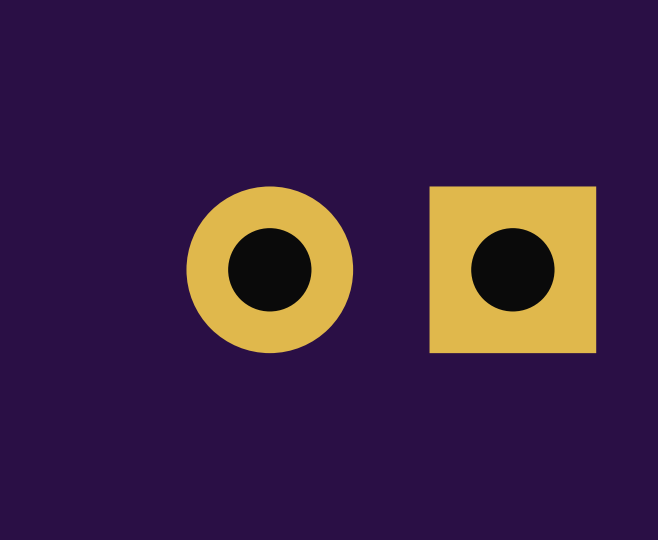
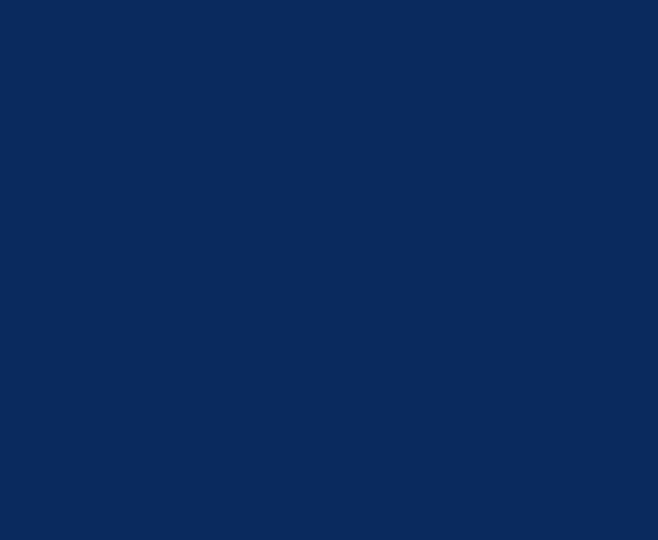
part: (391, 269) -> none

